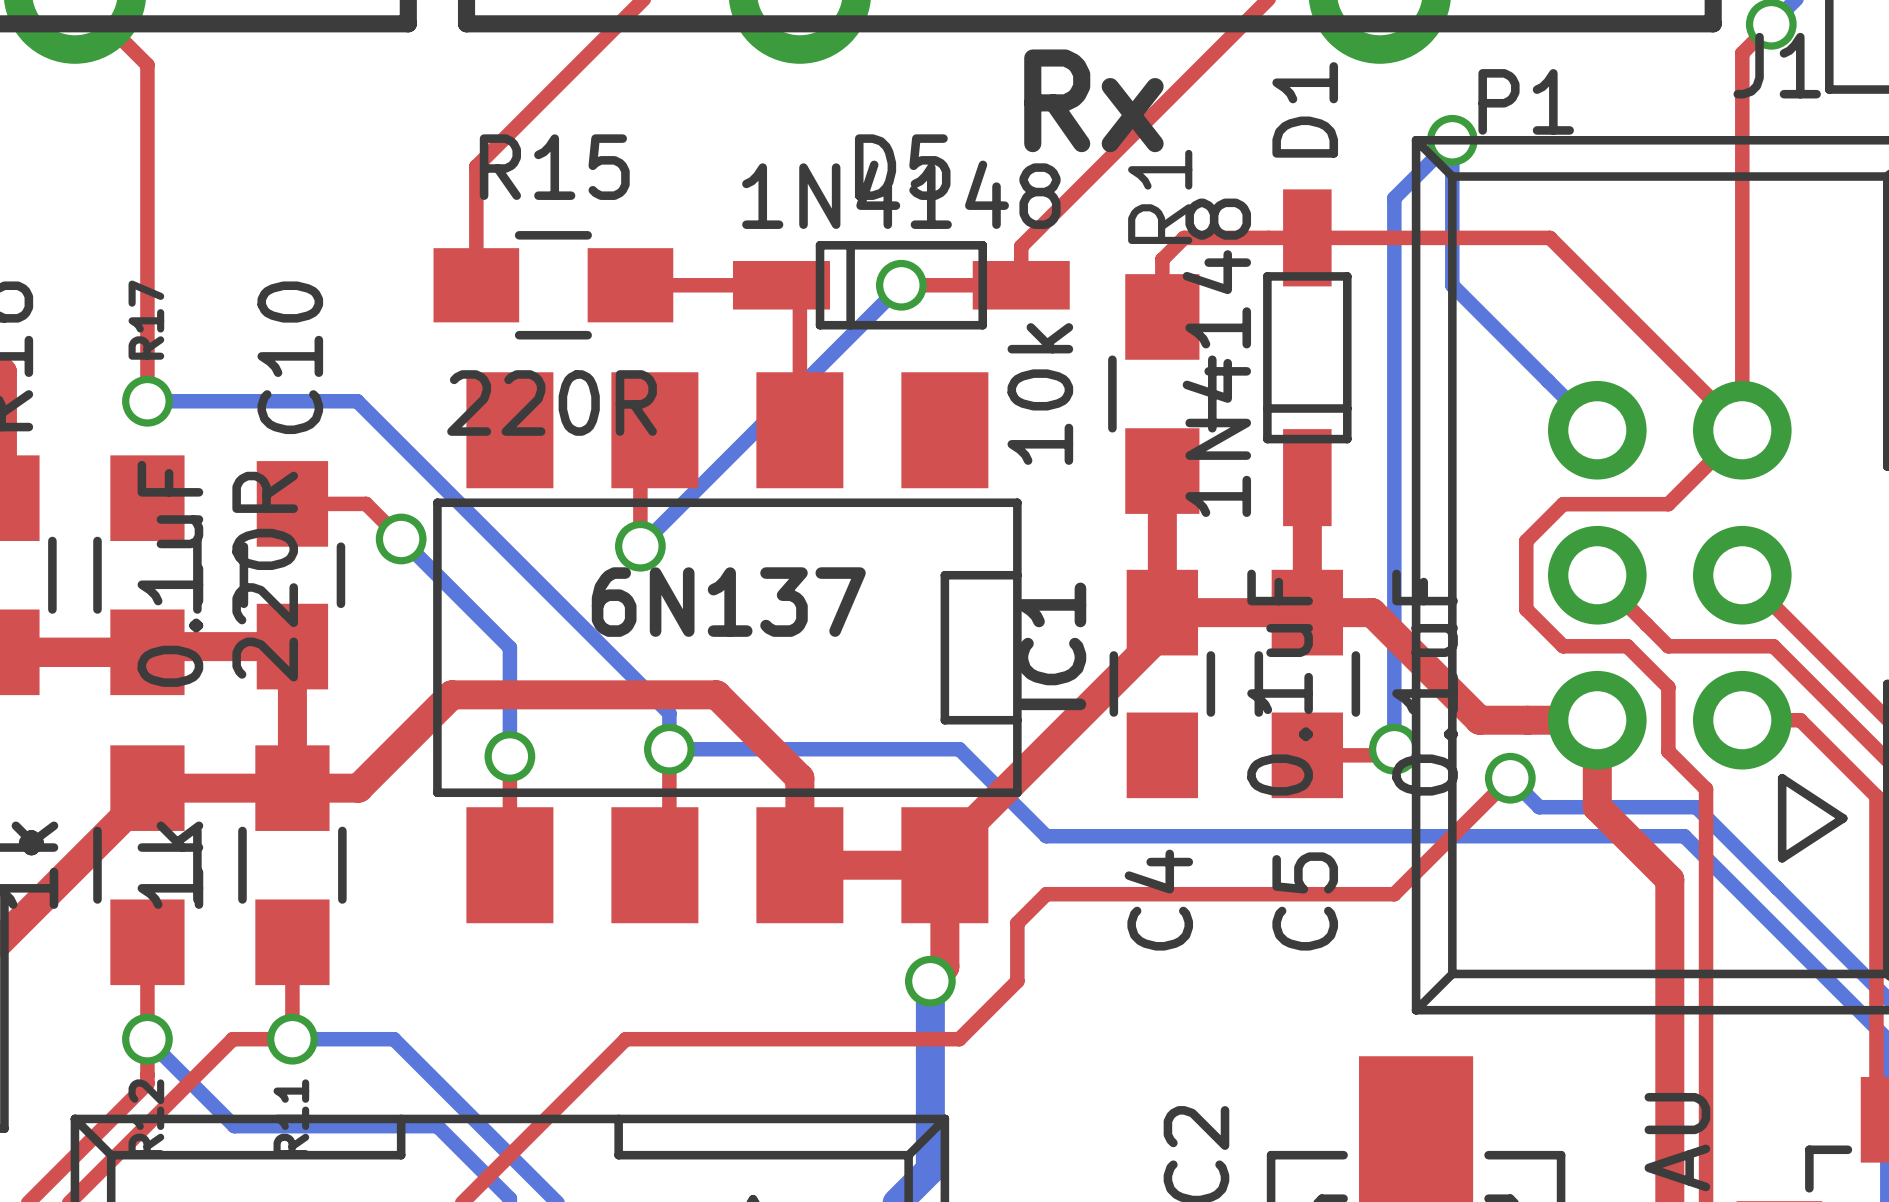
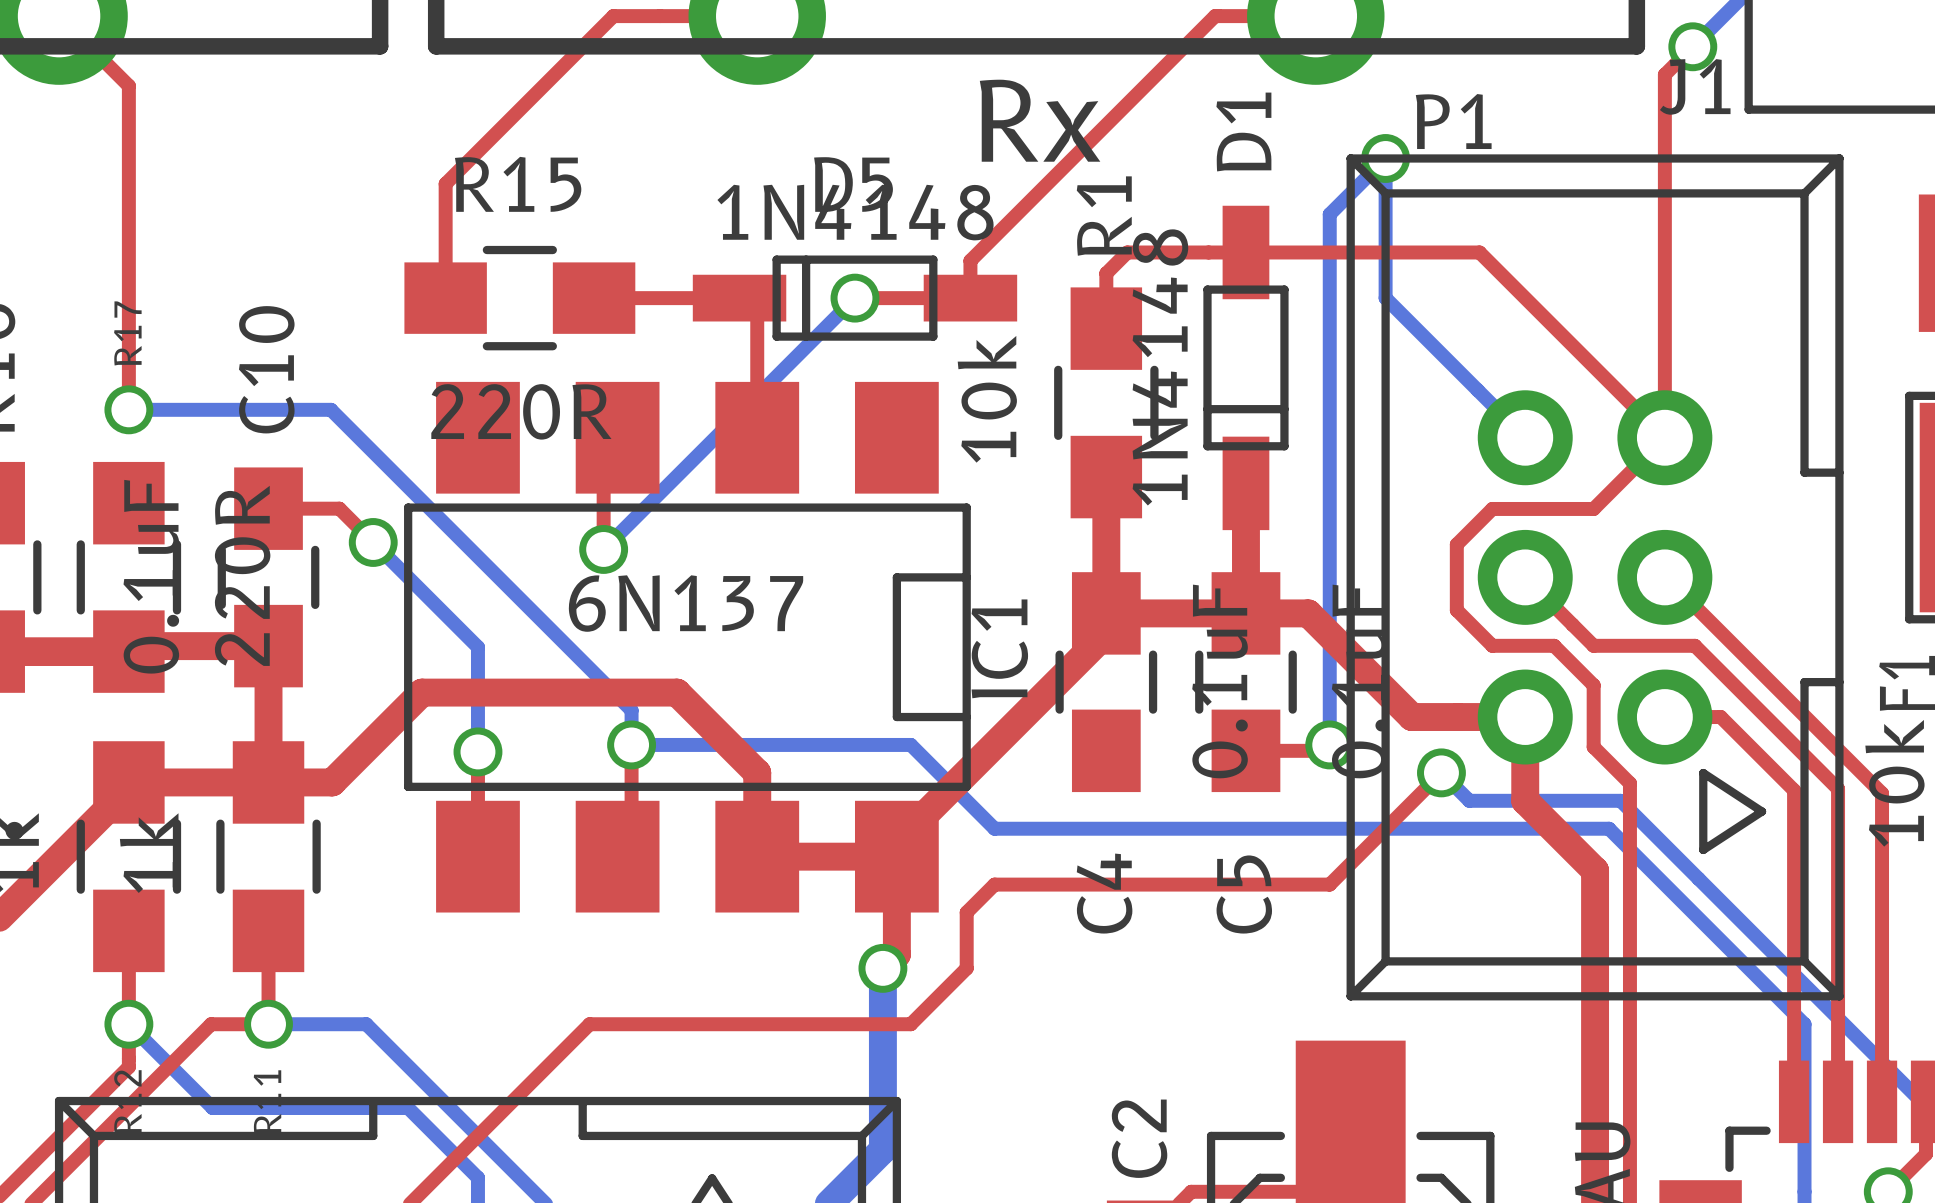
D1 footprint: [1263, 189, 1352, 527] -> [1203, 205, 1289, 531]

